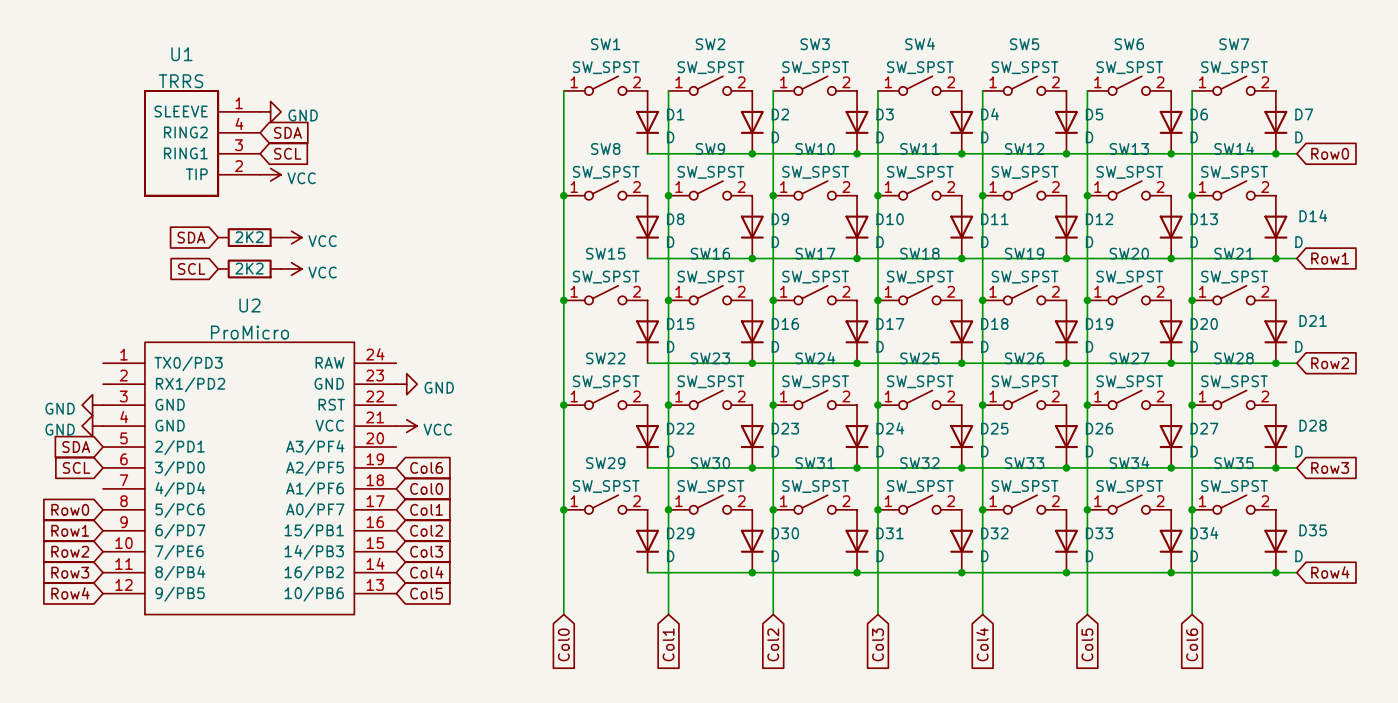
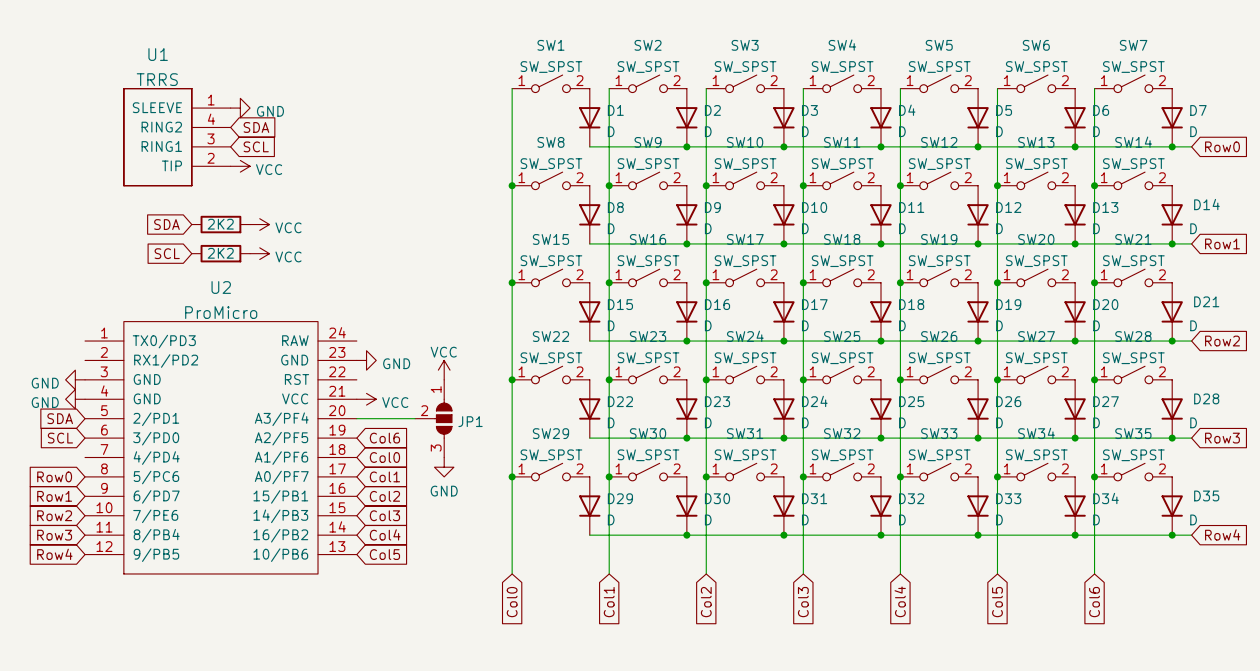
power symbol: none -> VCC (444, 370)
wire: none -> (356, 418) (415, 418)
JP1: none -> (433, 418)
power symbol: none -> GND (444, 467)

